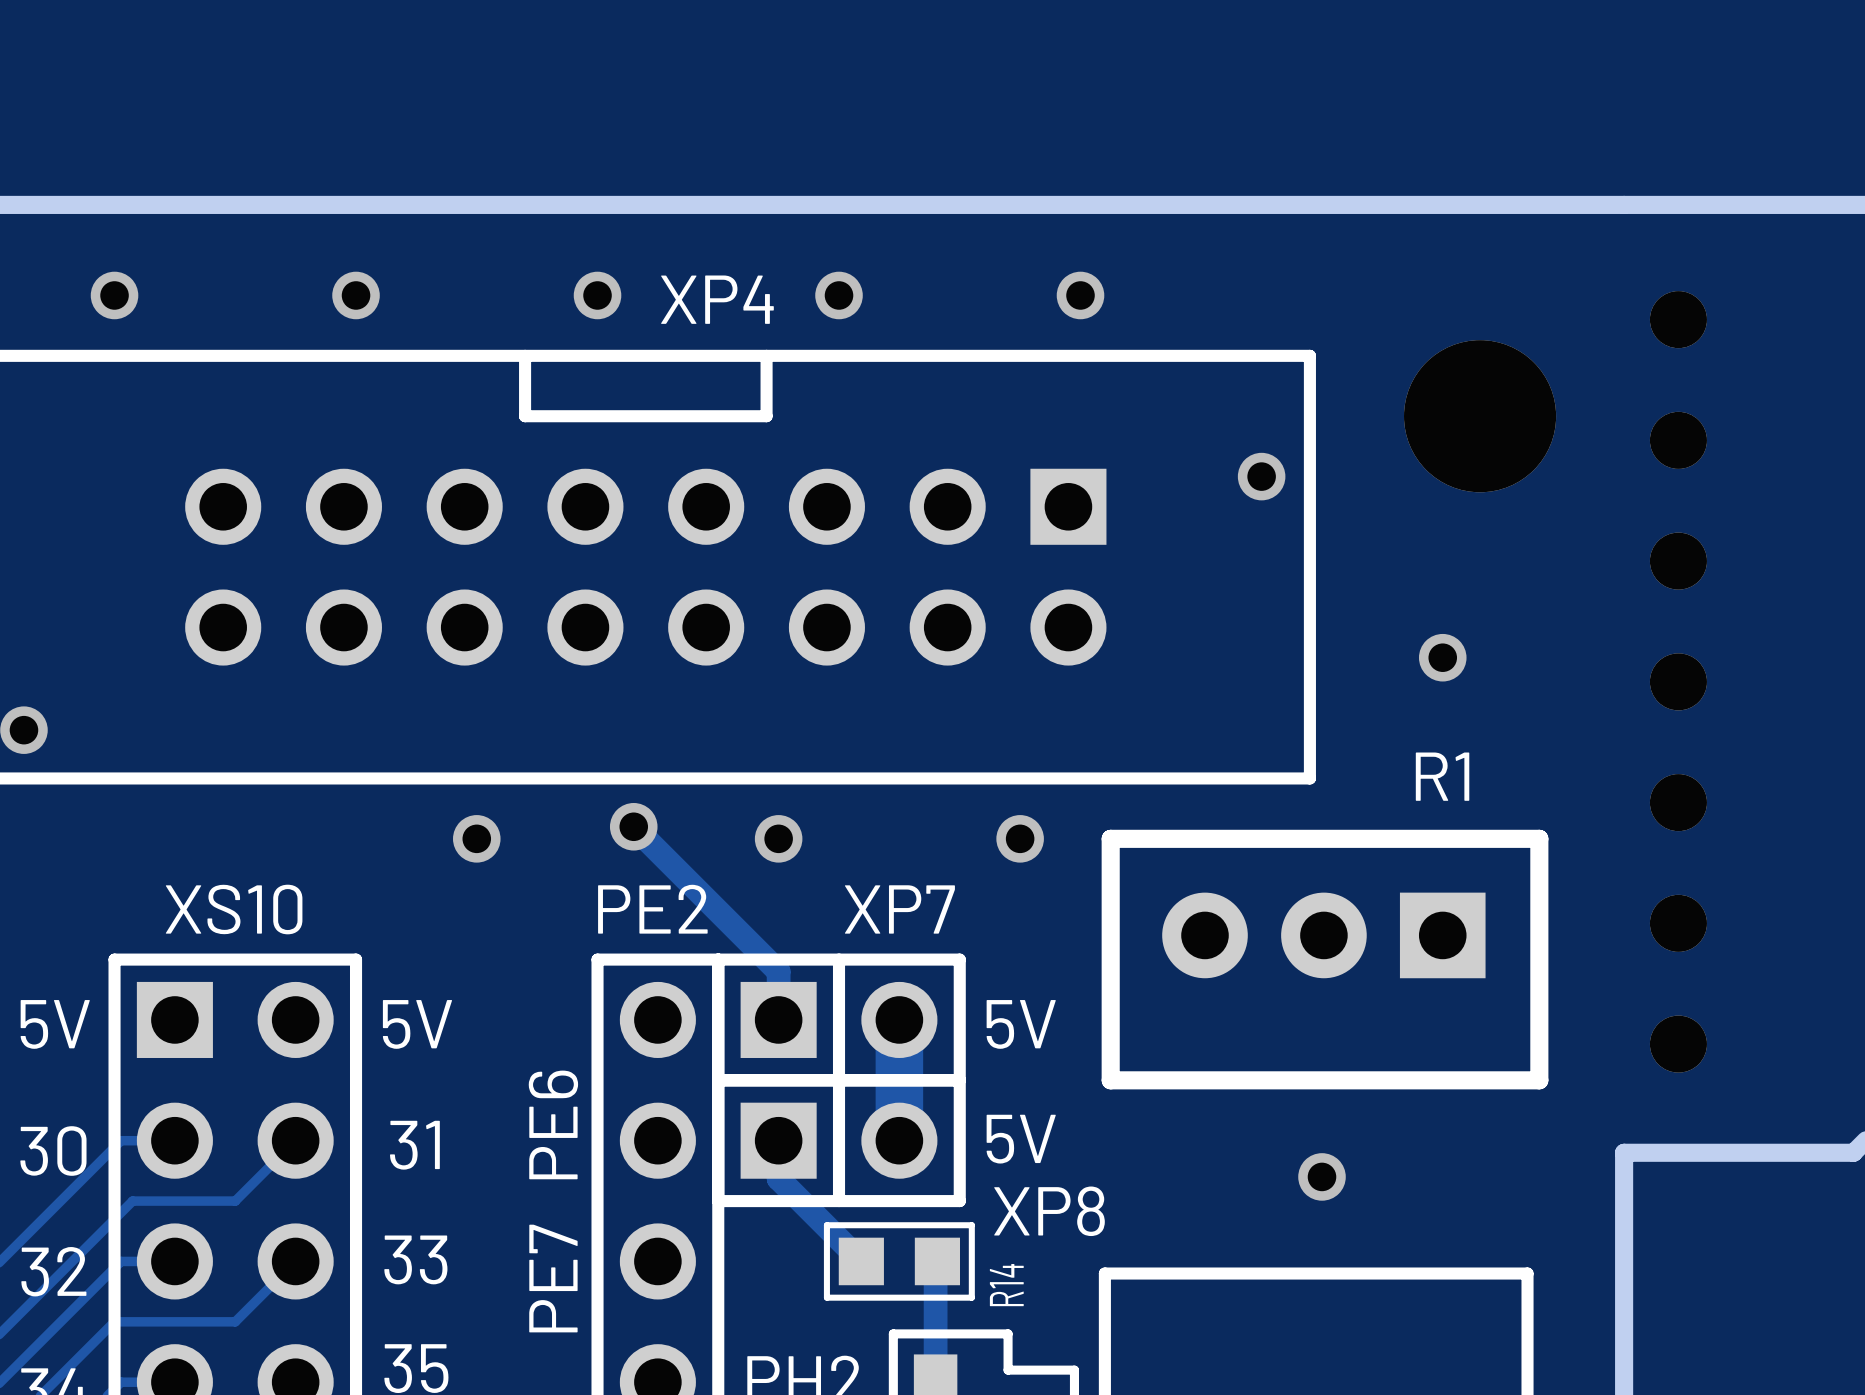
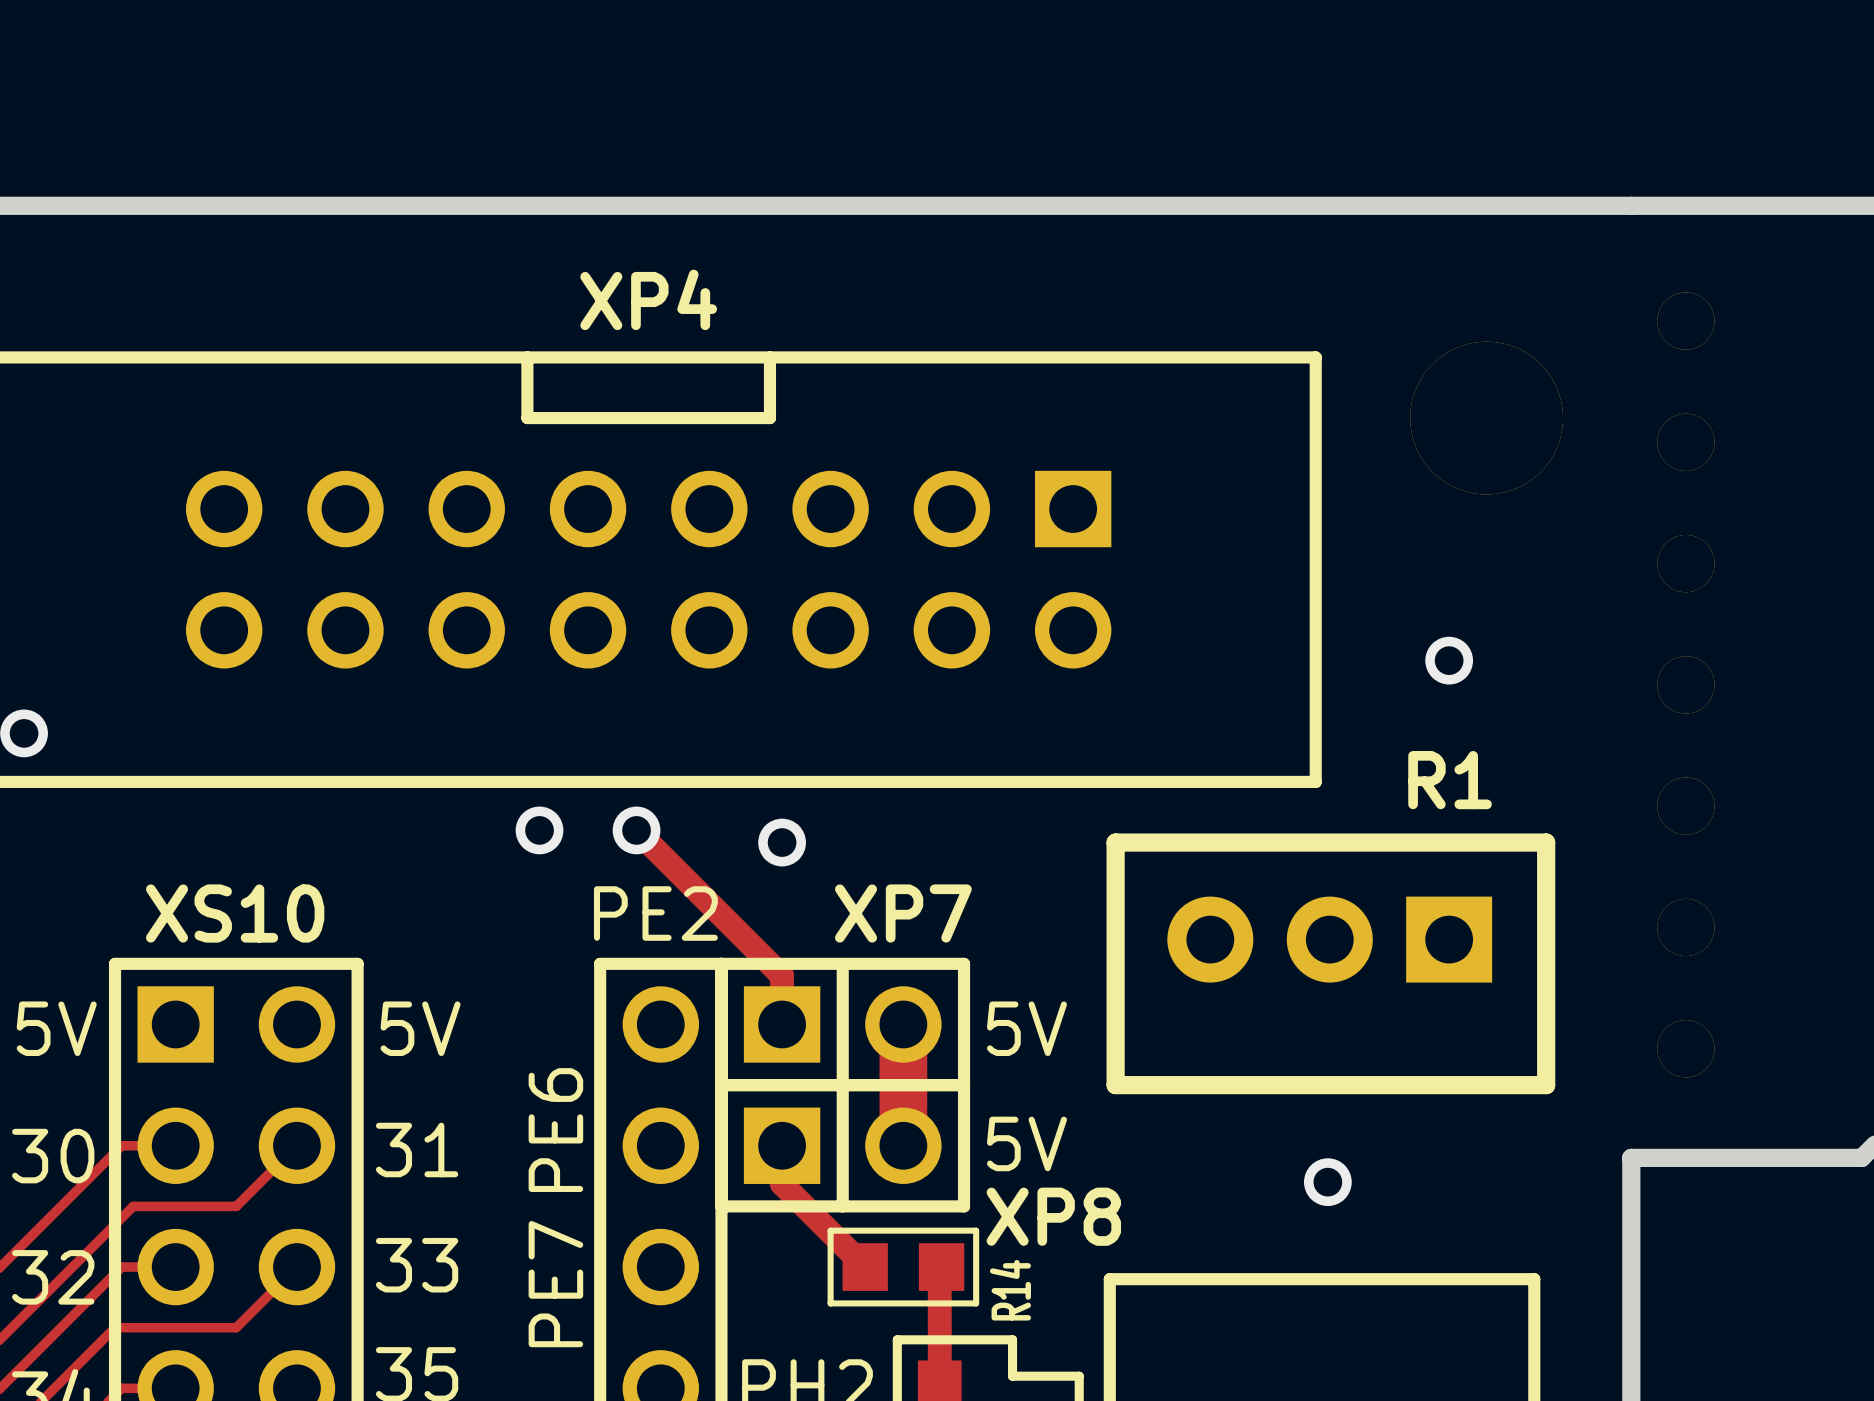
via: (114, 295) -> none
via: (356, 295) -> none
via: (597, 295) -> none
via: (839, 295) -> none
via: (1080, 295) -> none
XP4 name position: XP4 (717, 299) -> XP4 (648, 299)
via: (1261, 476) -> none
via position: (476, 838) -> (539, 830)
via: (1020, 838) -> none

